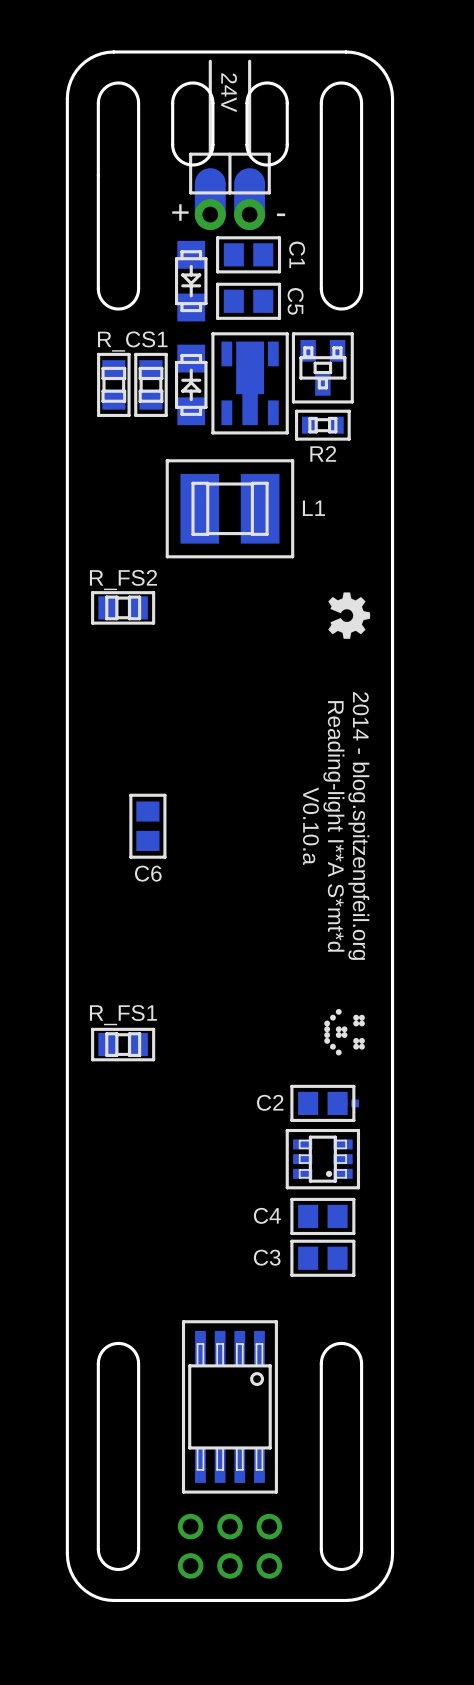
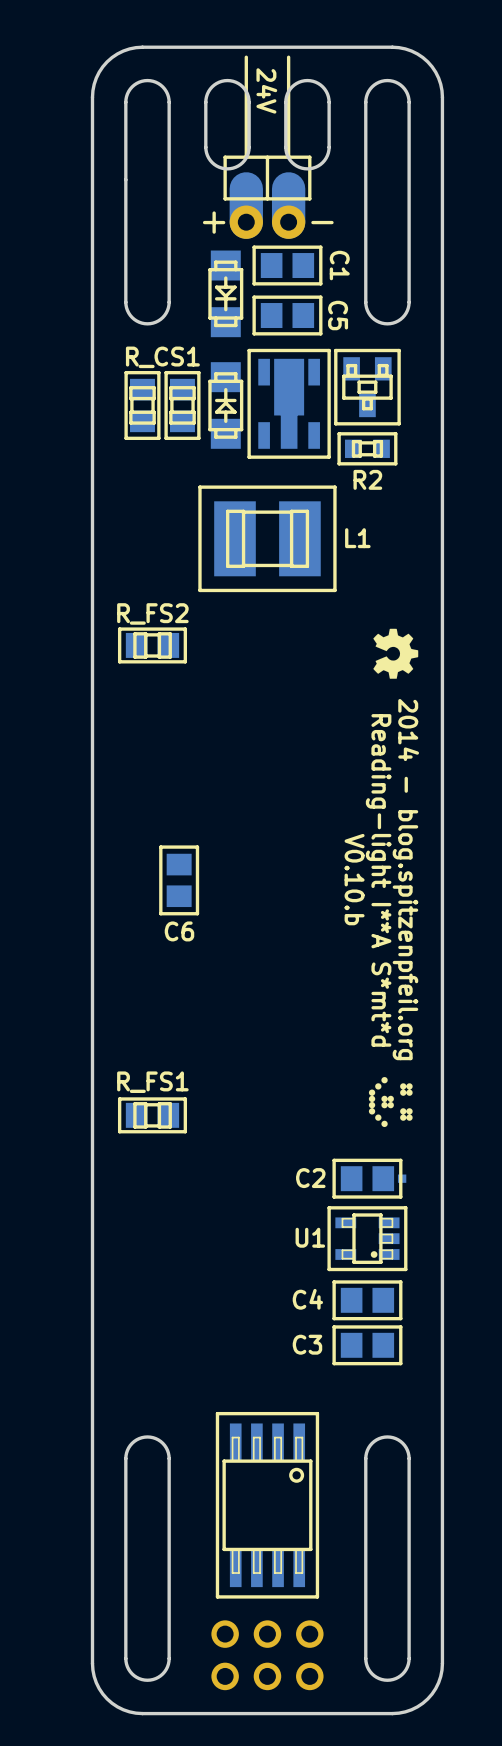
text: V0.10.a (310, 826) -> V0.10.b (354, 879)
part: (322, 1159) -> none
U1: none -> (367, 1238)

